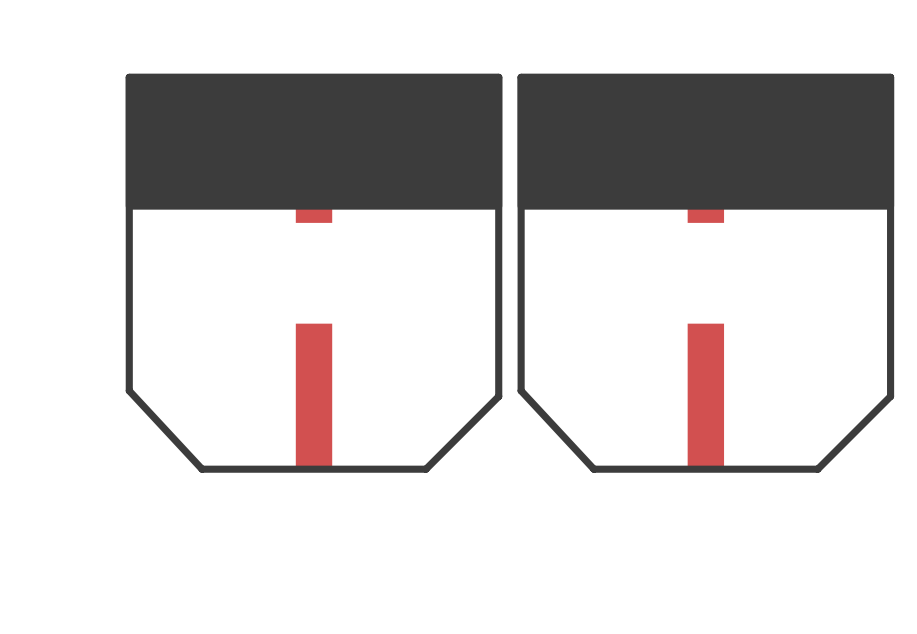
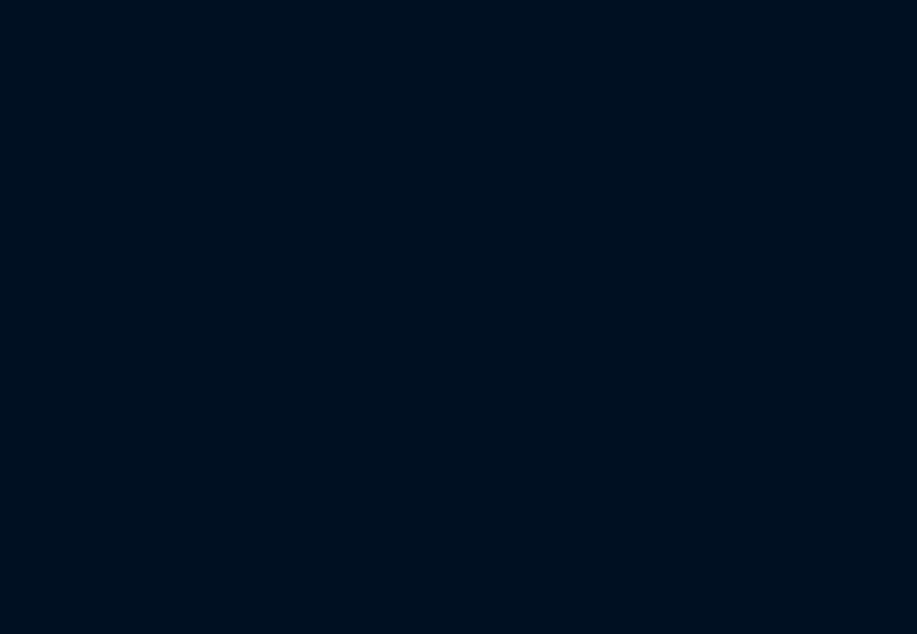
part: (314, 273) -> none
part: (705, 273) -> none

